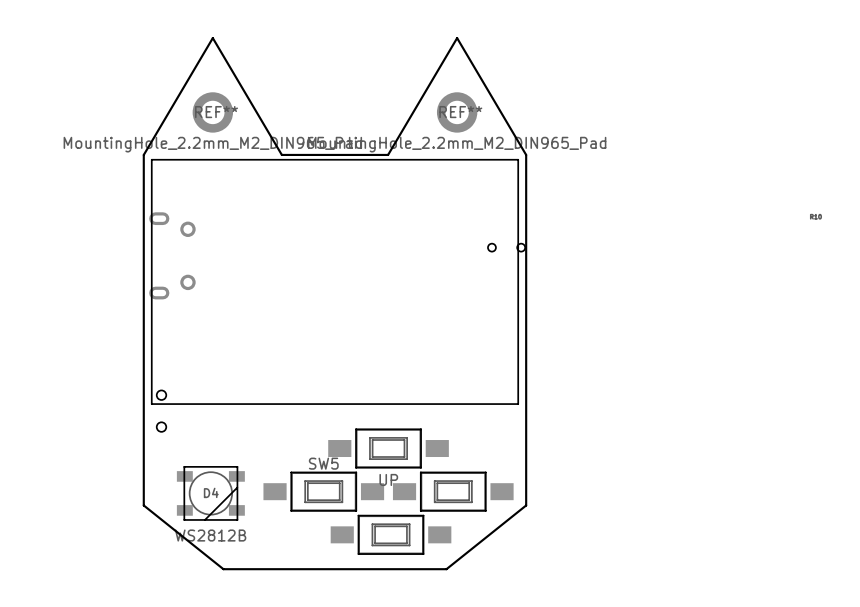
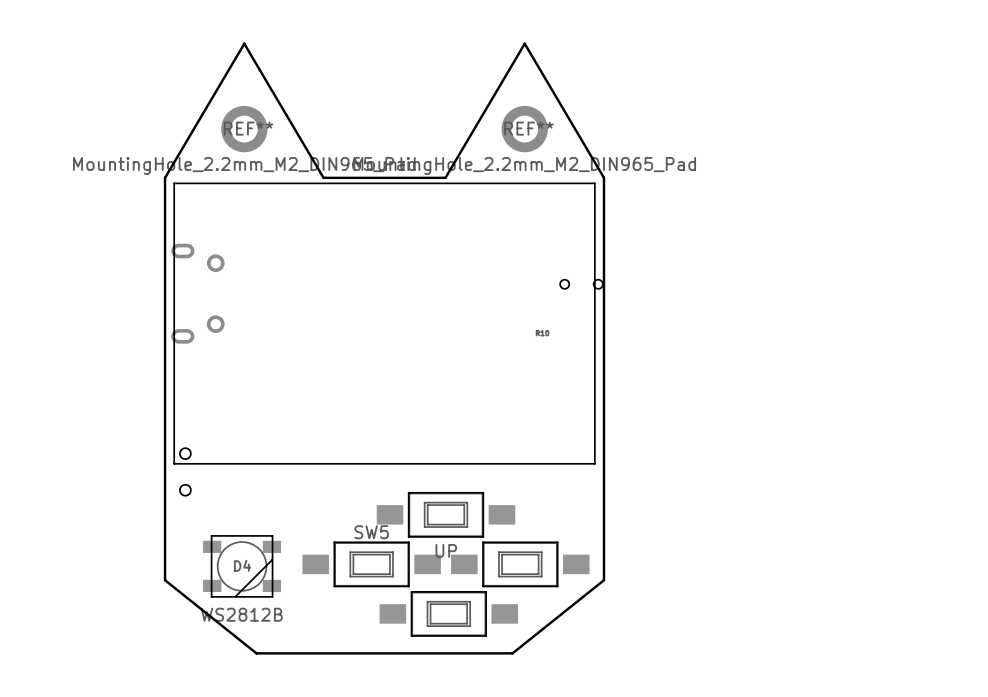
part position: (815, 216) -> (542, 333)

